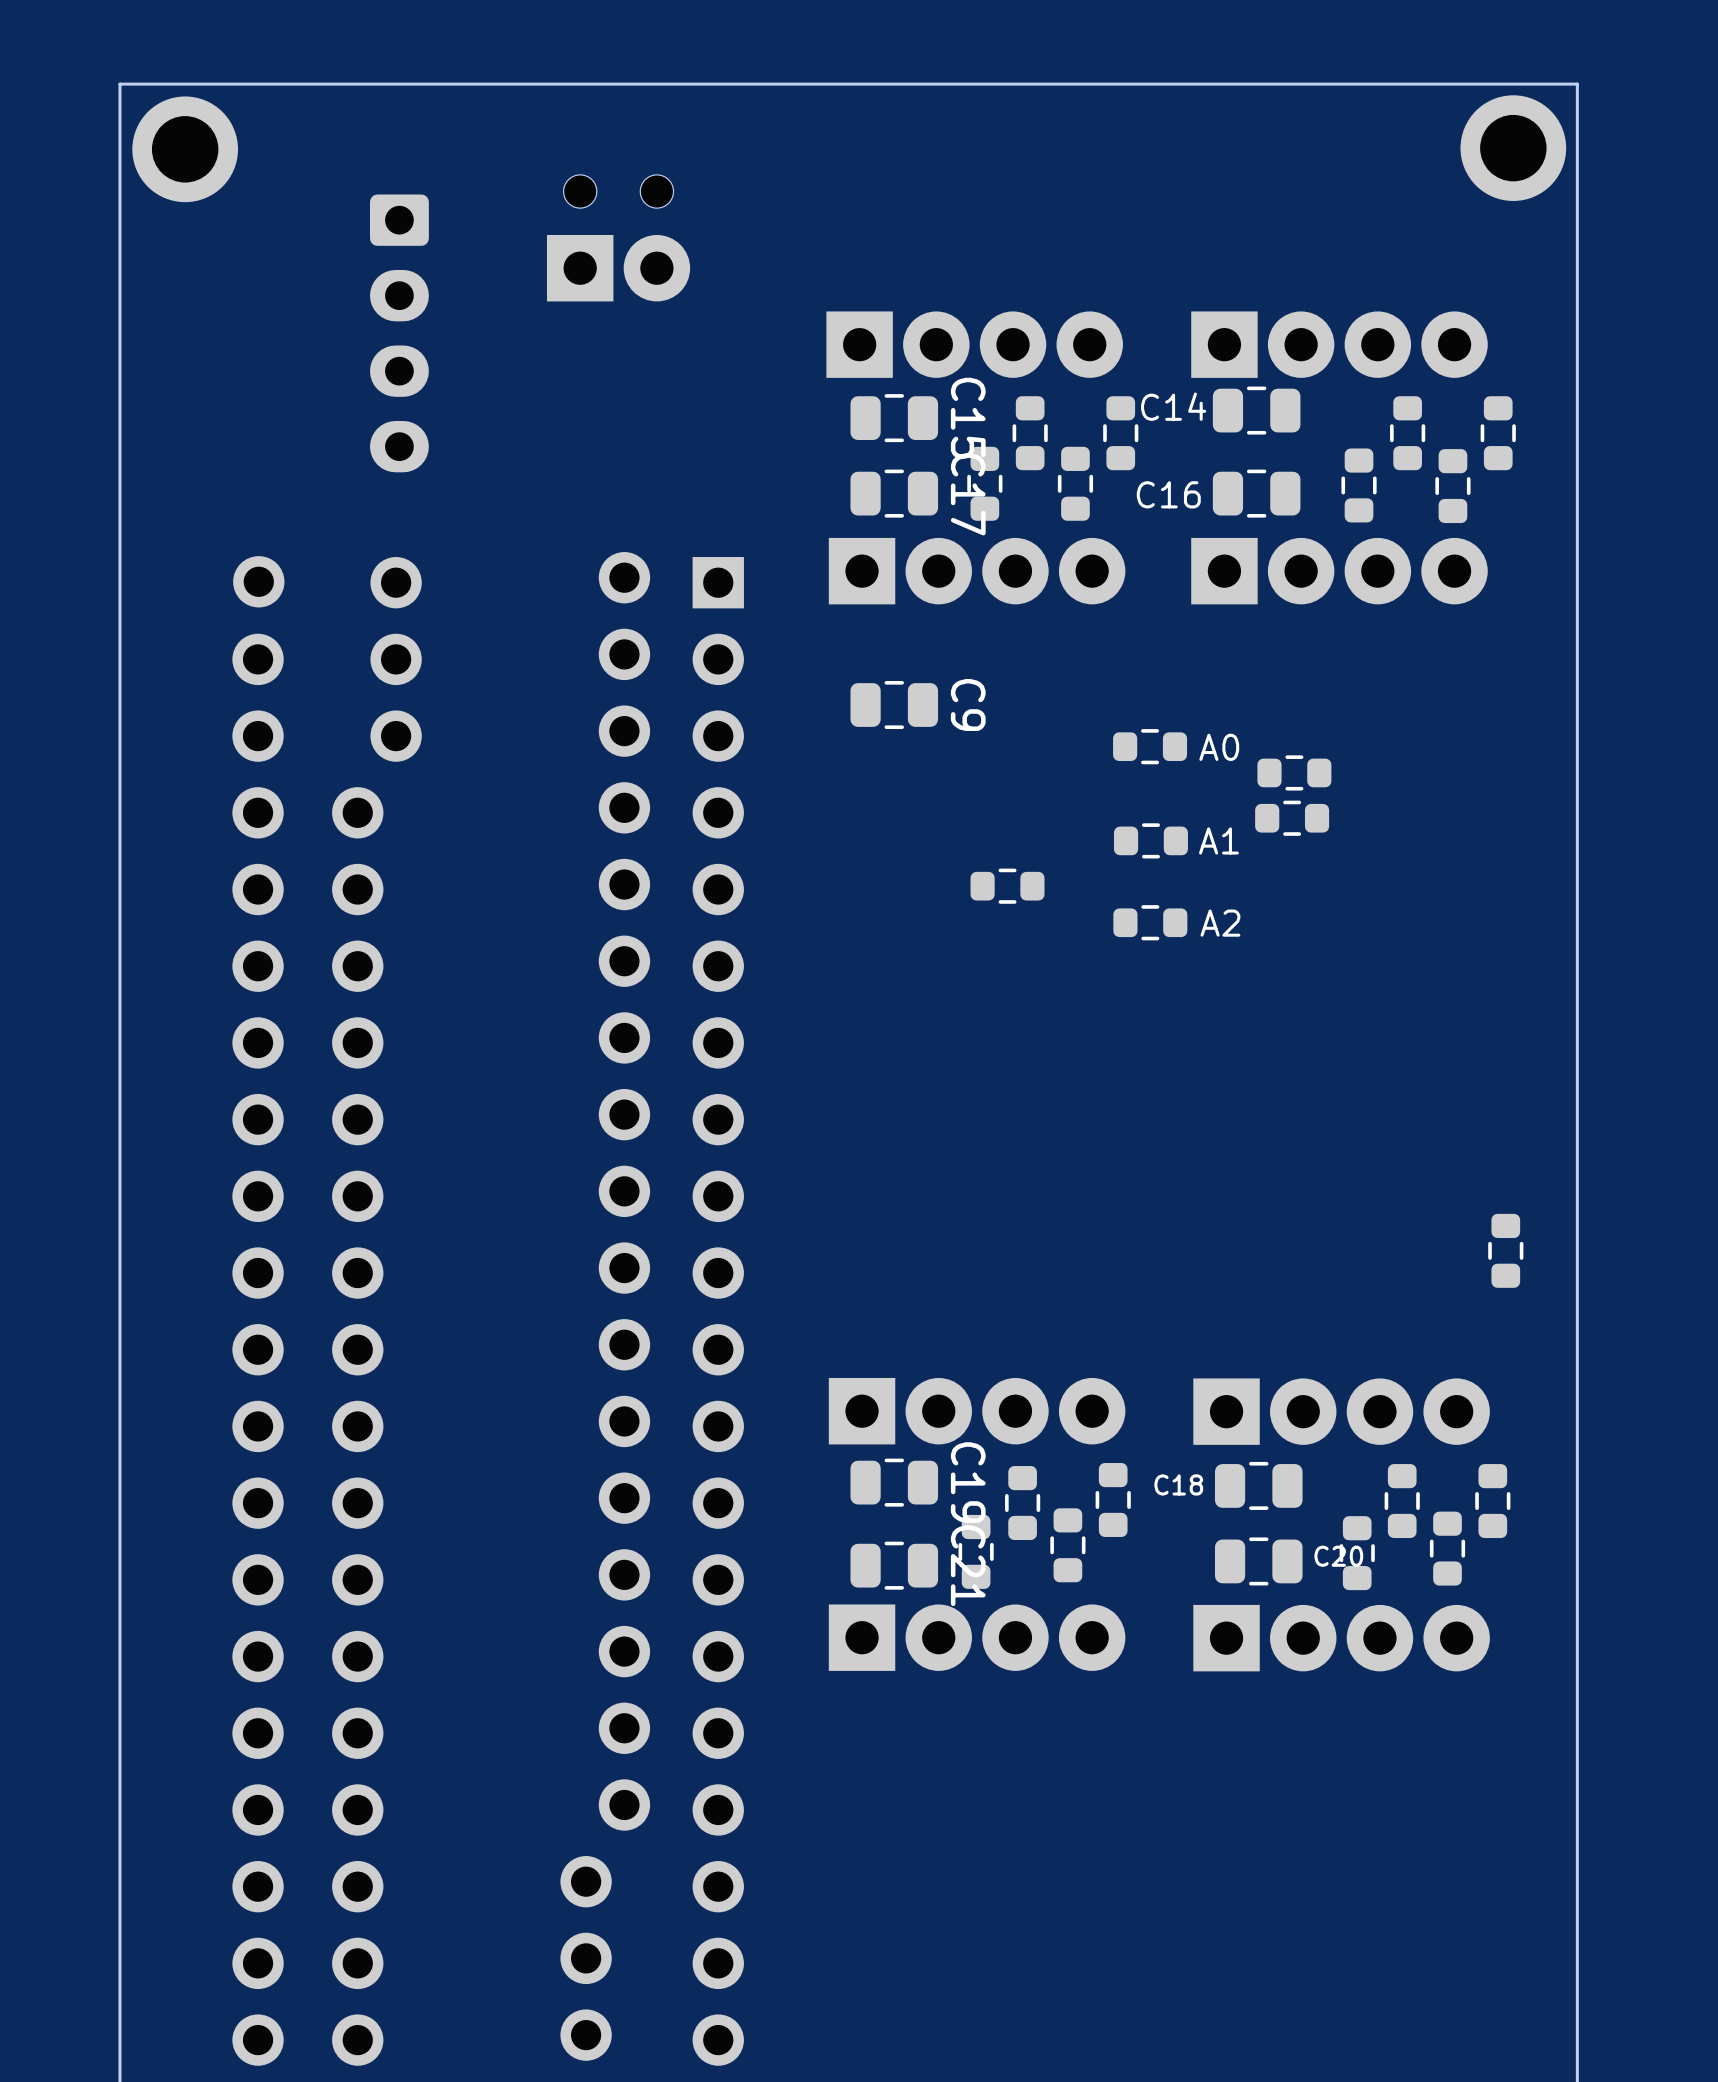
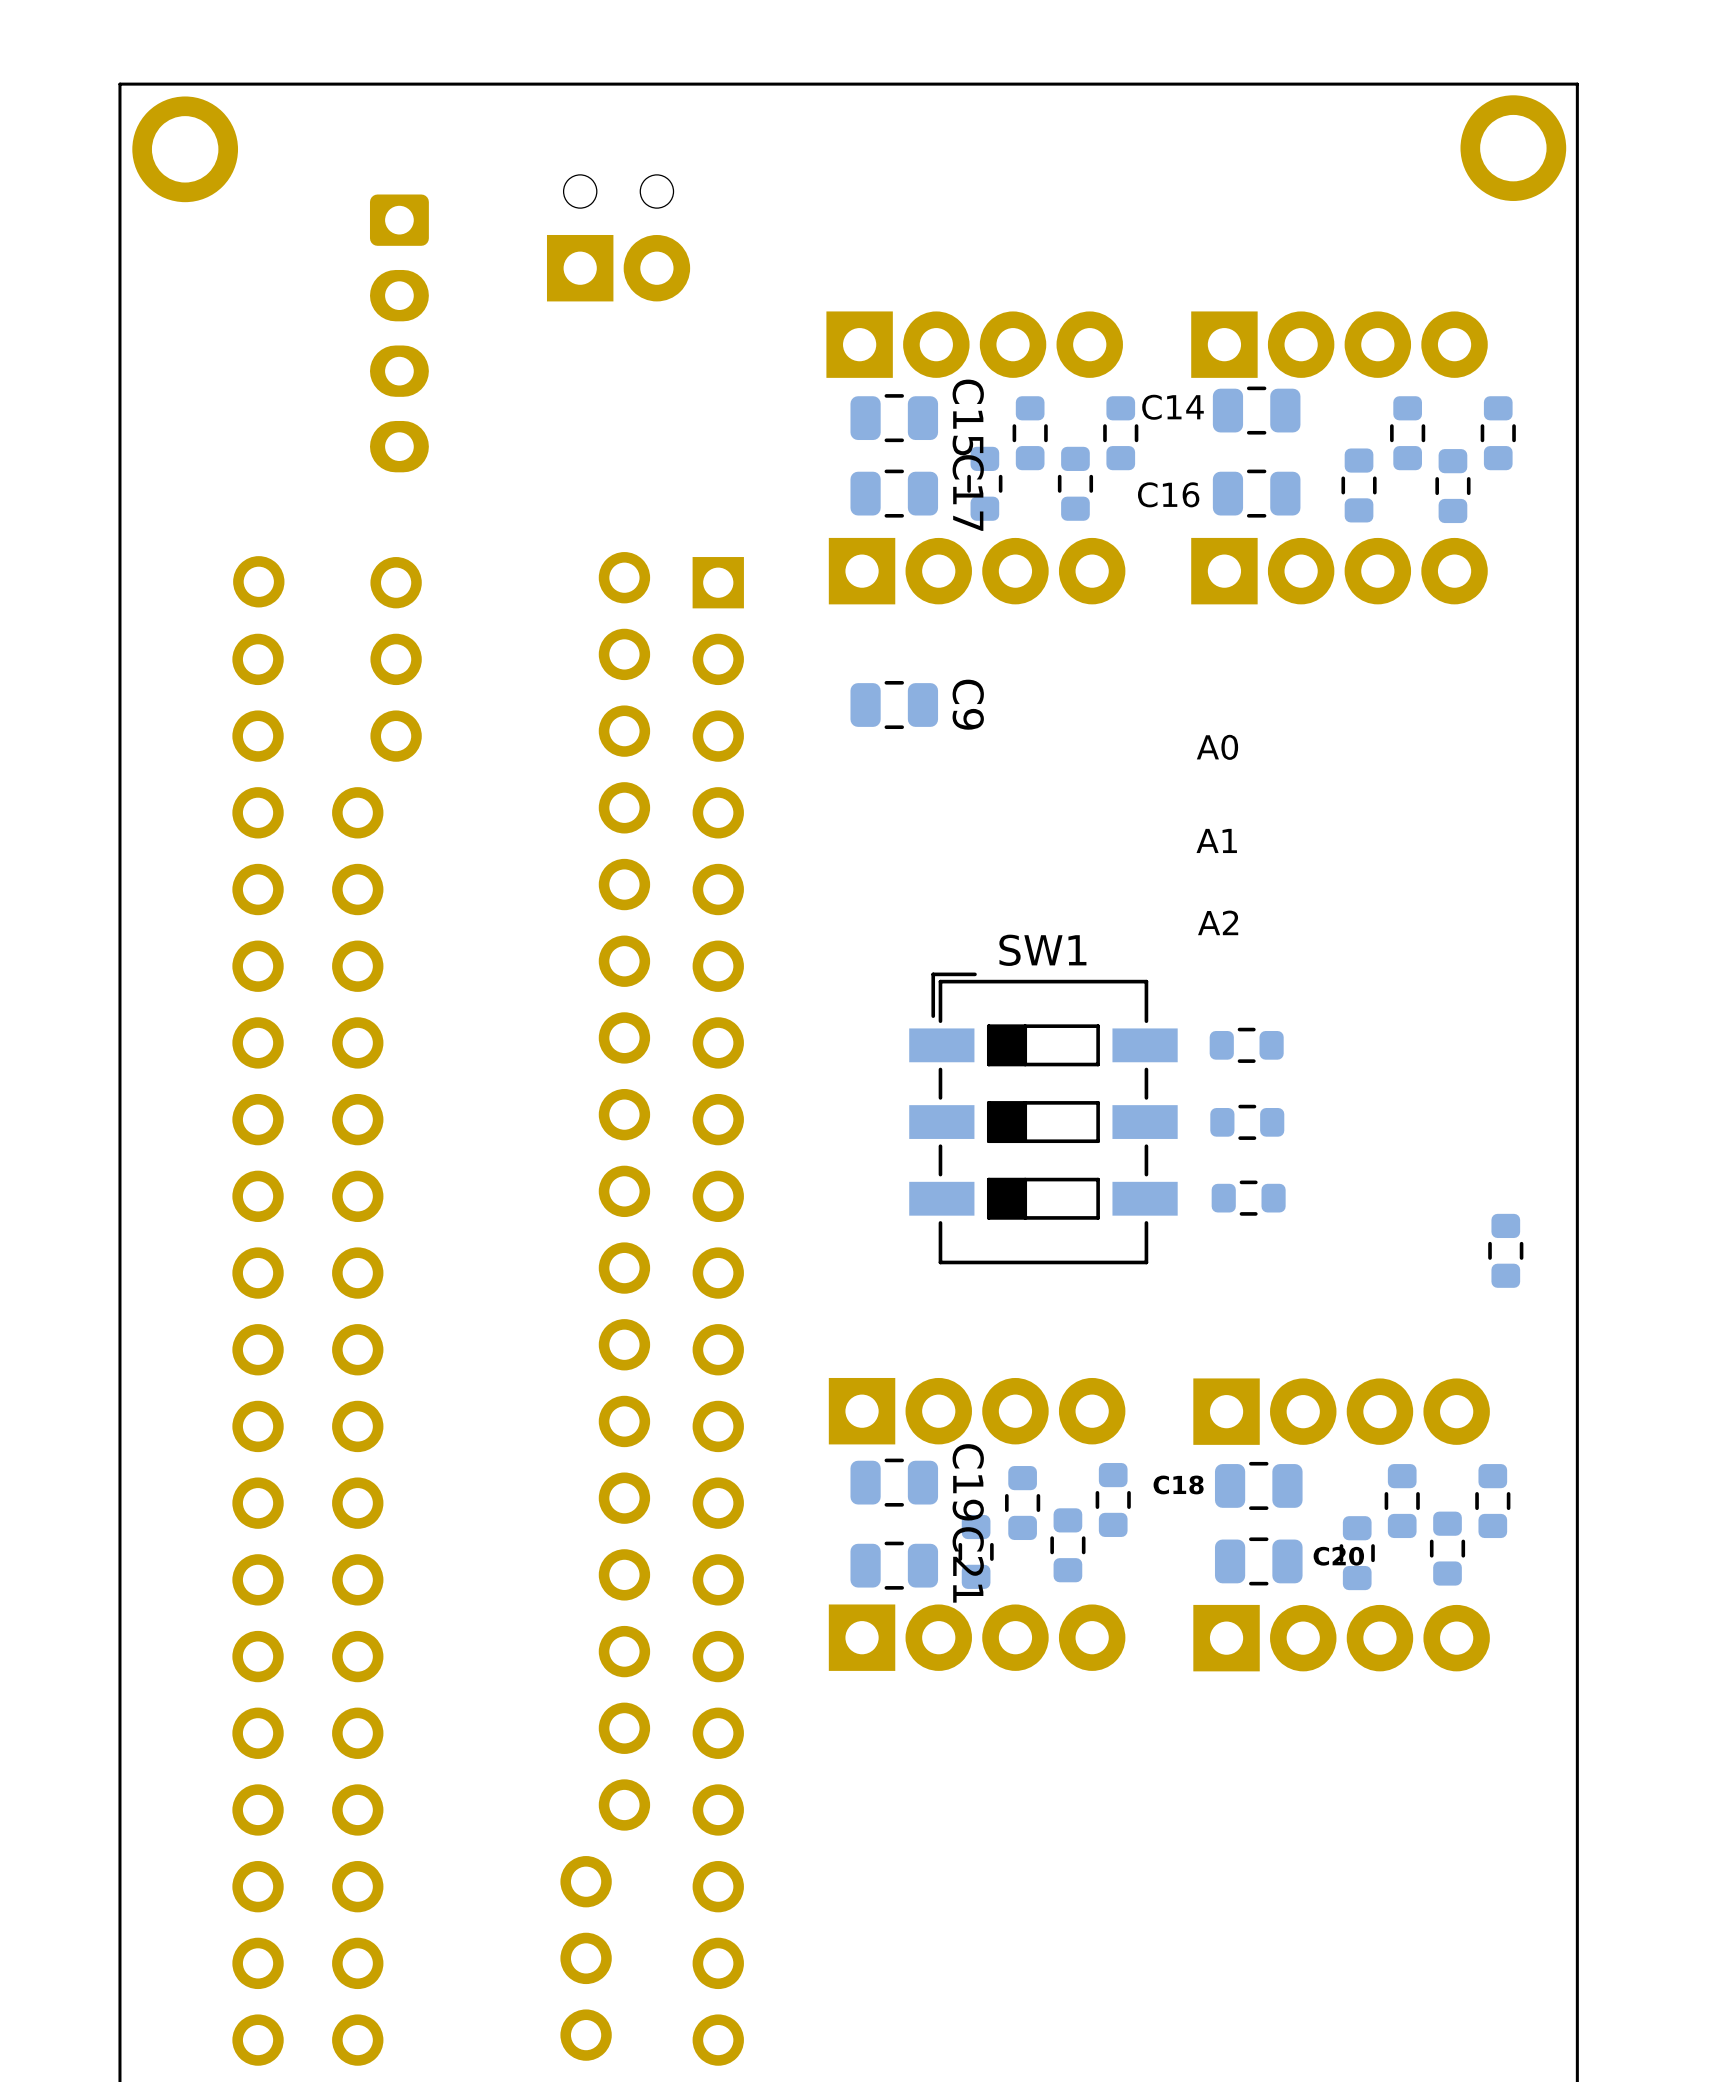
part: (1150, 746) -> none
part: (1294, 772) -> none
part: (1292, 818) -> none
part: (1150, 840) -> none
part: (1007, 886) -> none
part: (1150, 922) -> none
part: none -> (1246, 1045)
SW1: none -> (1043, 1118)
part: none -> (1247, 1122)
part: none -> (1248, 1198)

